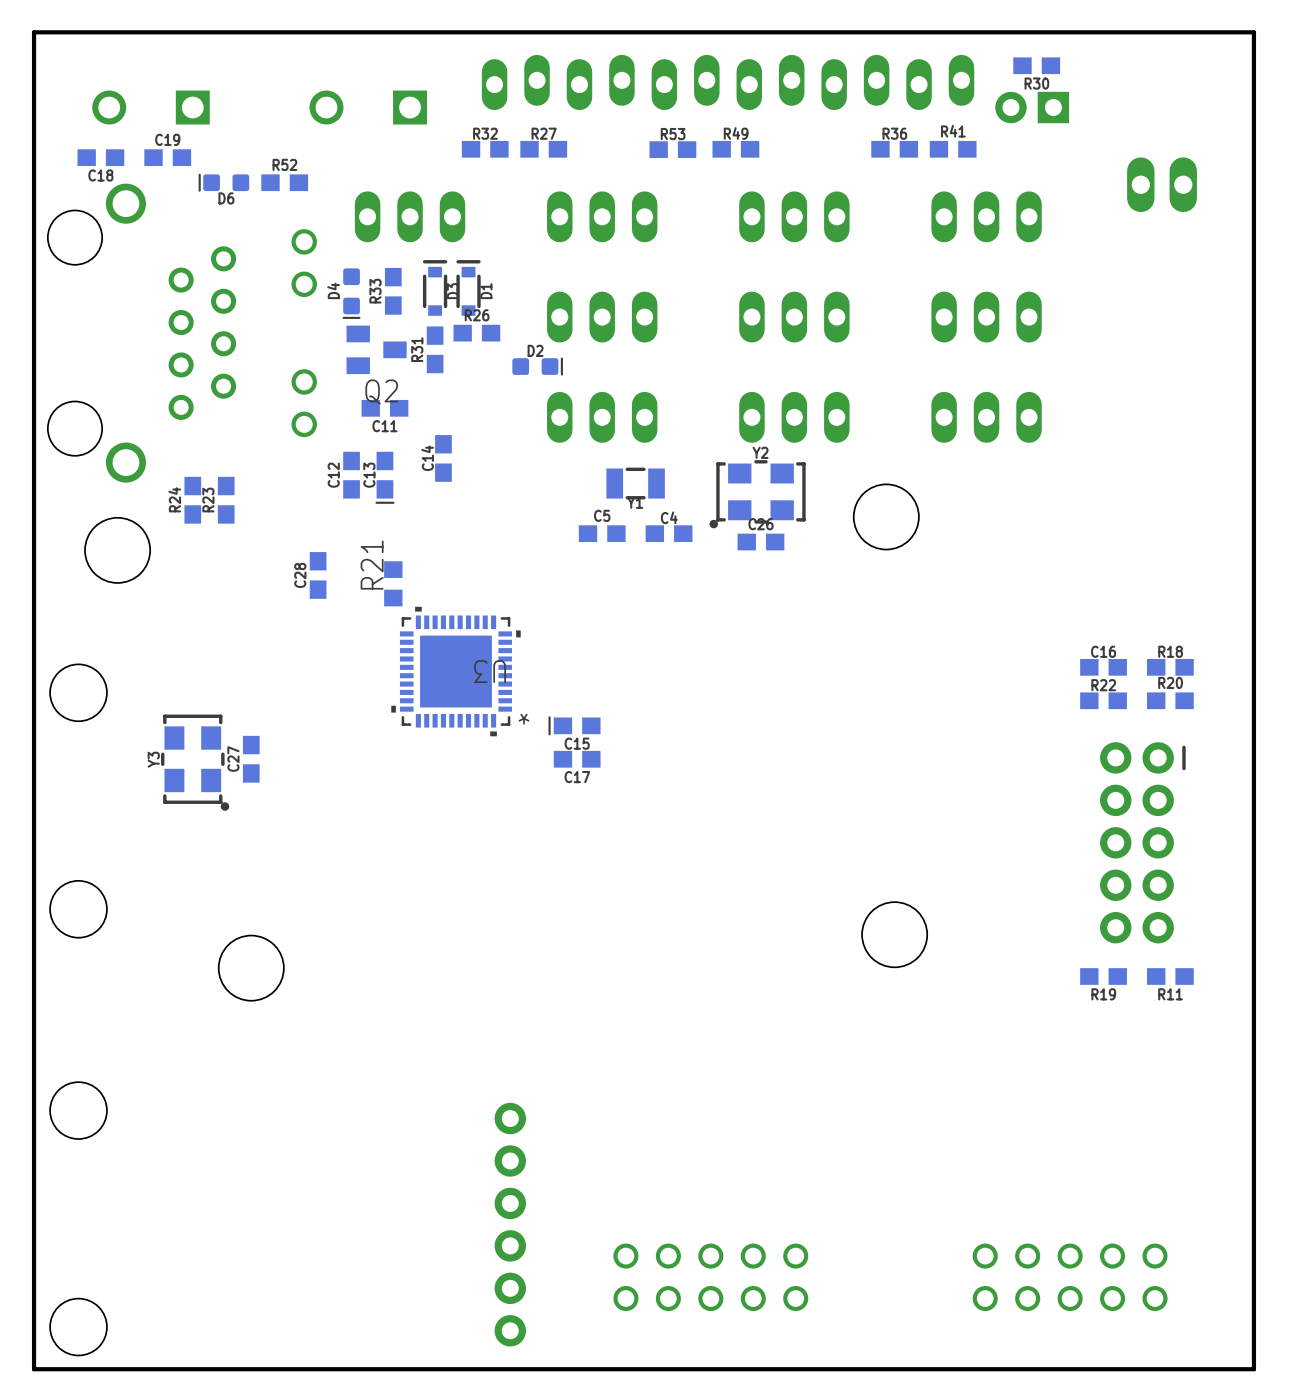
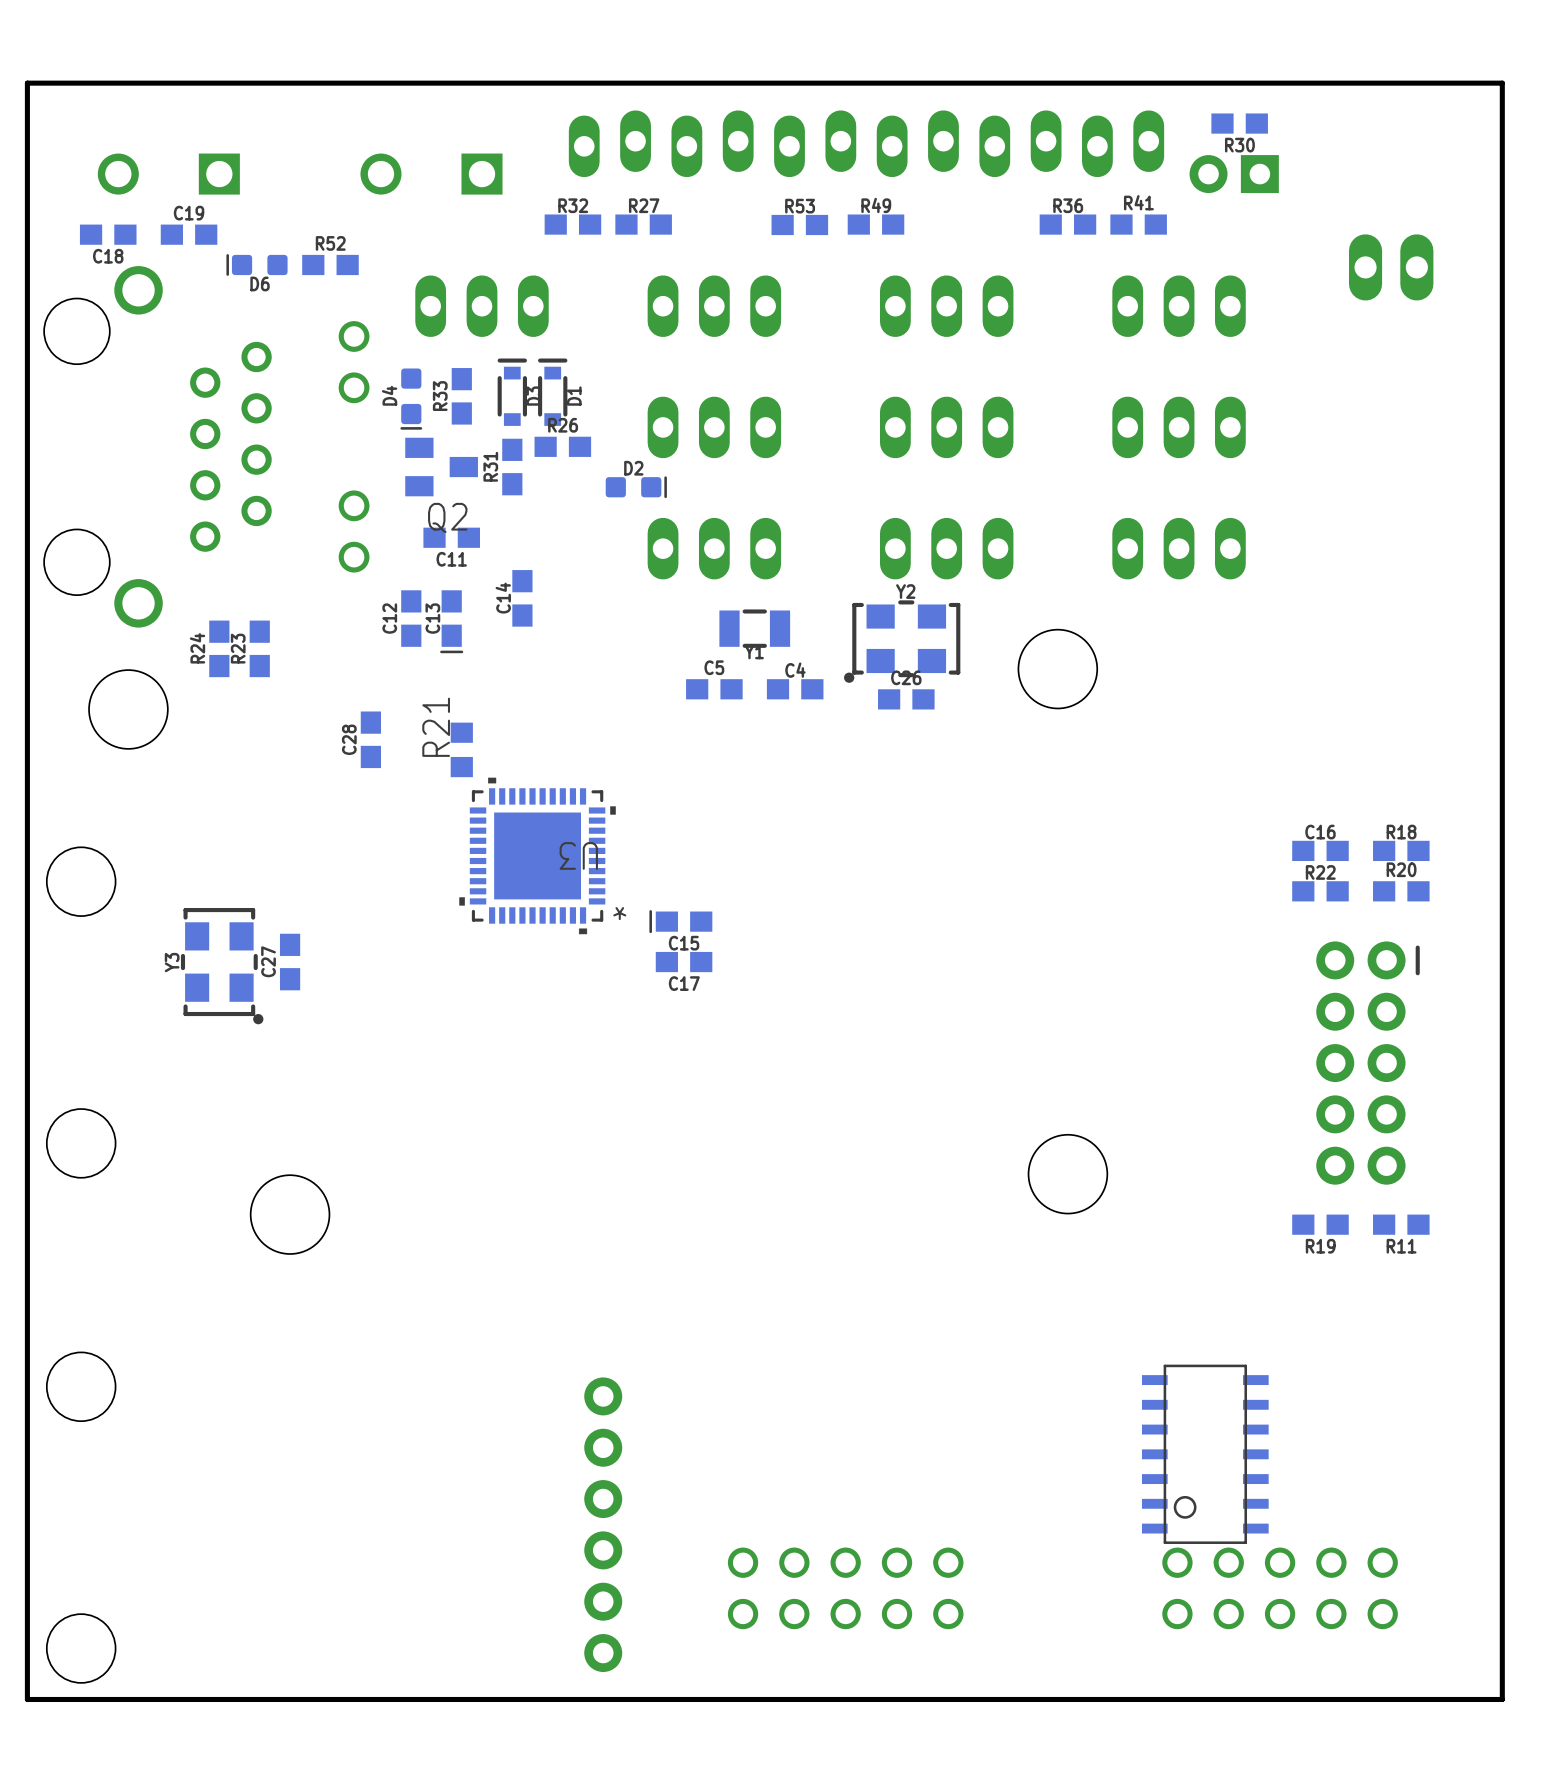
part: none -> (1205, 1454)

